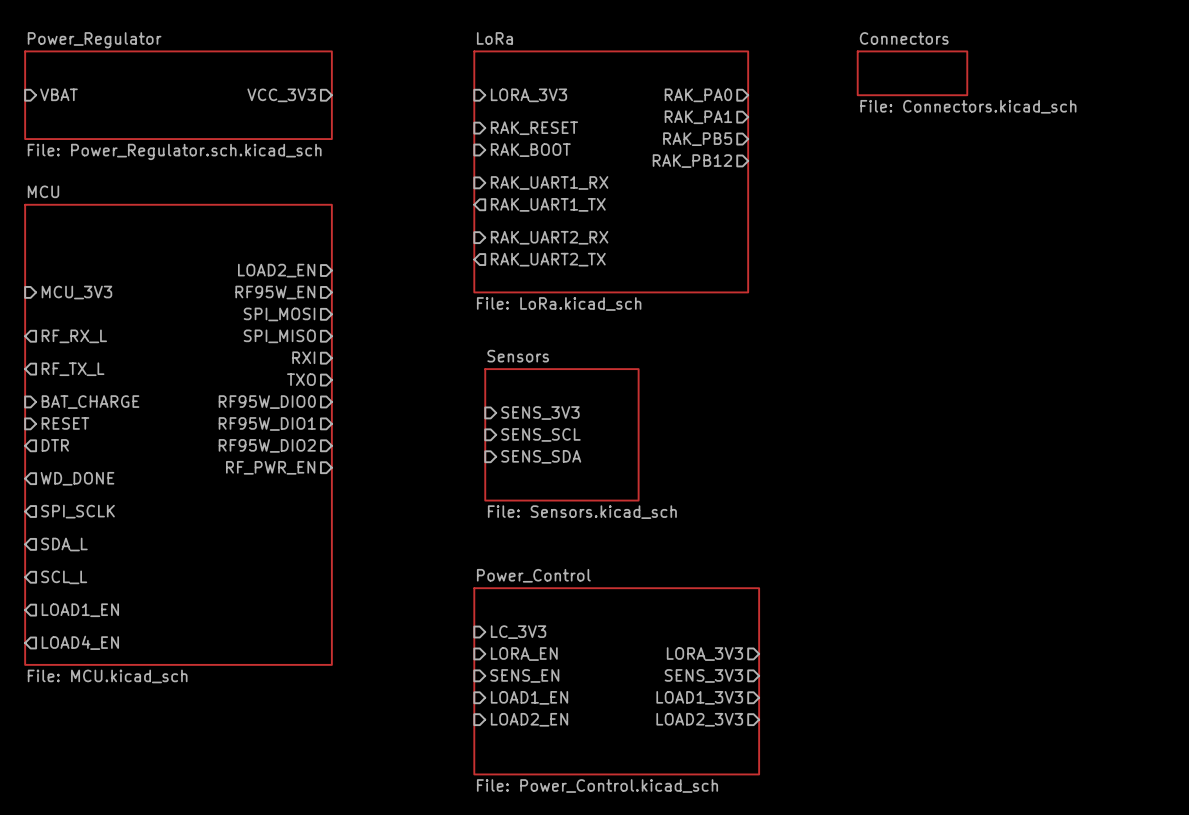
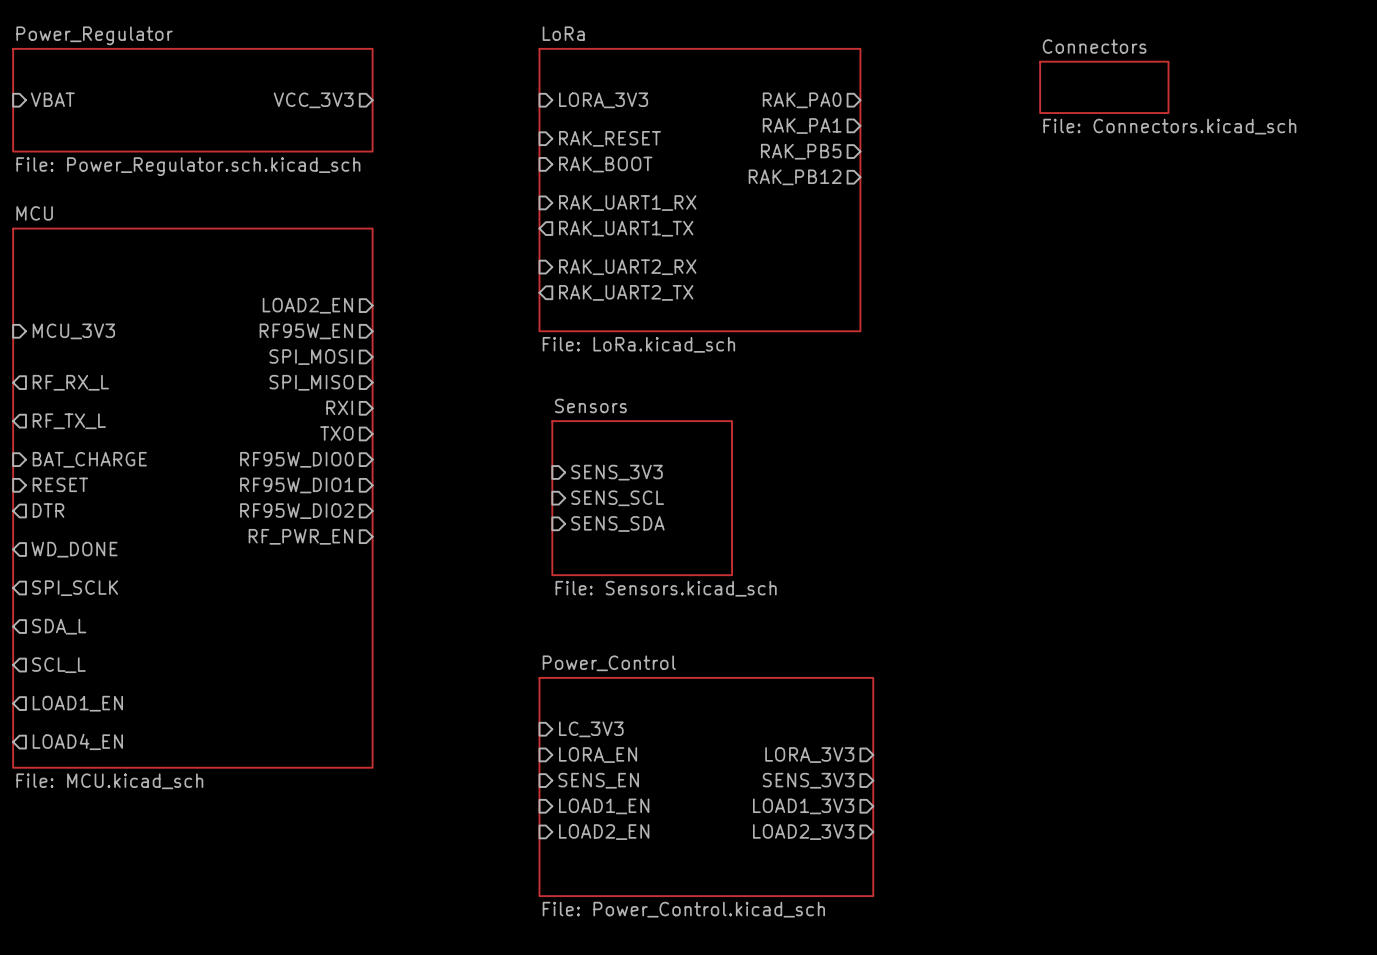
sheet Connectors position: (912, 73) -> (1104, 87)

